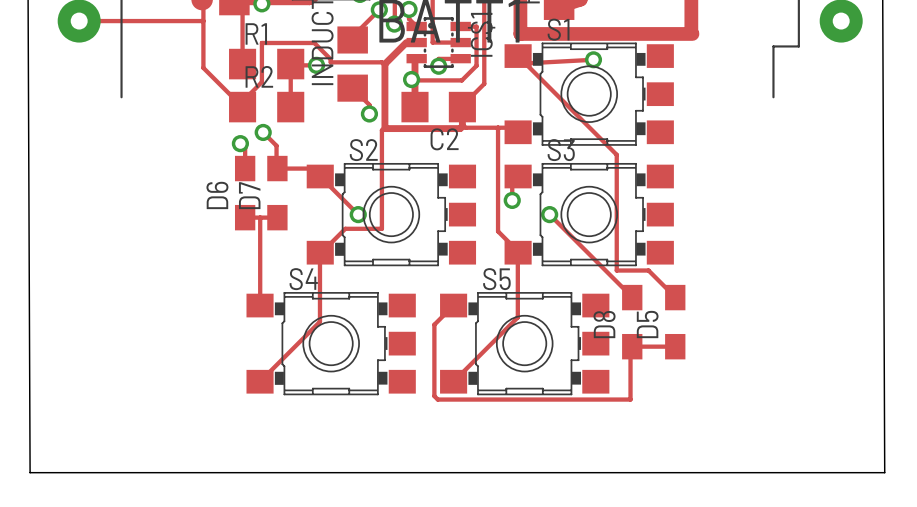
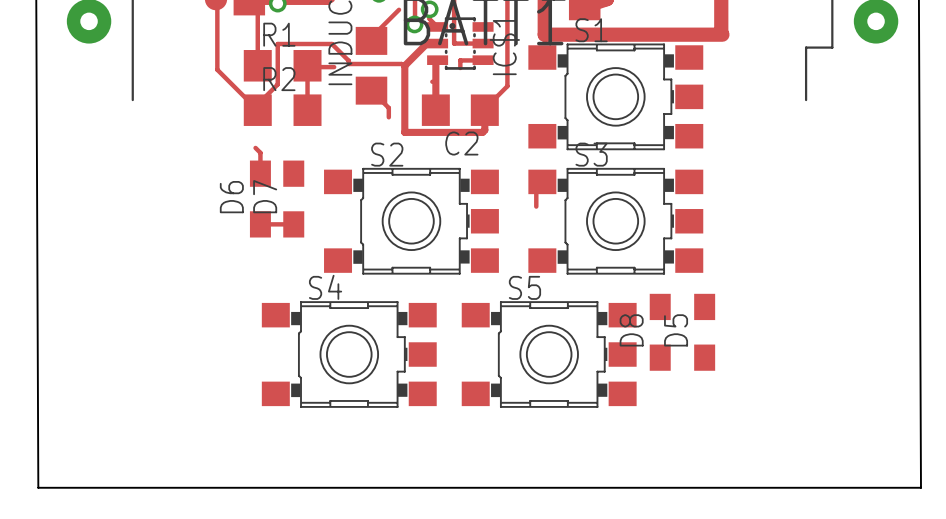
via: (379, 9) -> none
track: (79, 21) (203, 21) -> none
track: (460, 26) (476, 26) (476, 65) (461, 80) (414, 80) -> none
track: (518, 56) (616, 154) (616, 270) (648, 270) (675, 297) -> none
track: (593, 59) (525, 63) -> none
via: (593, 59) -> none
via: (316, 65) -> none
via: (438, 66) -> none
via: (411, 79) -> none
via: (369, 113) -> none
track: (462, 126) (517, 127) (518, 132) -> none
track: (498, 127) (498, 231) (518, 252) -> none
track: (384, 128) (381, 130) (381, 228) (345, 228) (320, 252) -> none
track: (263, 132) (276, 145) (277, 168) (319, 168) (319, 176) -> none
via: (263, 132) -> none
via: (240, 143) -> none
track: (320, 176) (358, 214) -> none
via: (512, 200) -> none
via: (358, 214) -> none
track: (549, 214) (632, 297) -> none
via: (549, 214) -> none
track: (260, 217) (260, 305) -> none
track: (319, 252) (319, 321) (260, 381) -> none
track: (517, 252) (517, 317) (453, 381) -> none
track: (453, 305) (434, 324) (434, 396) (437, 399) (630, 399) (630, 347) (675, 346) -> none

